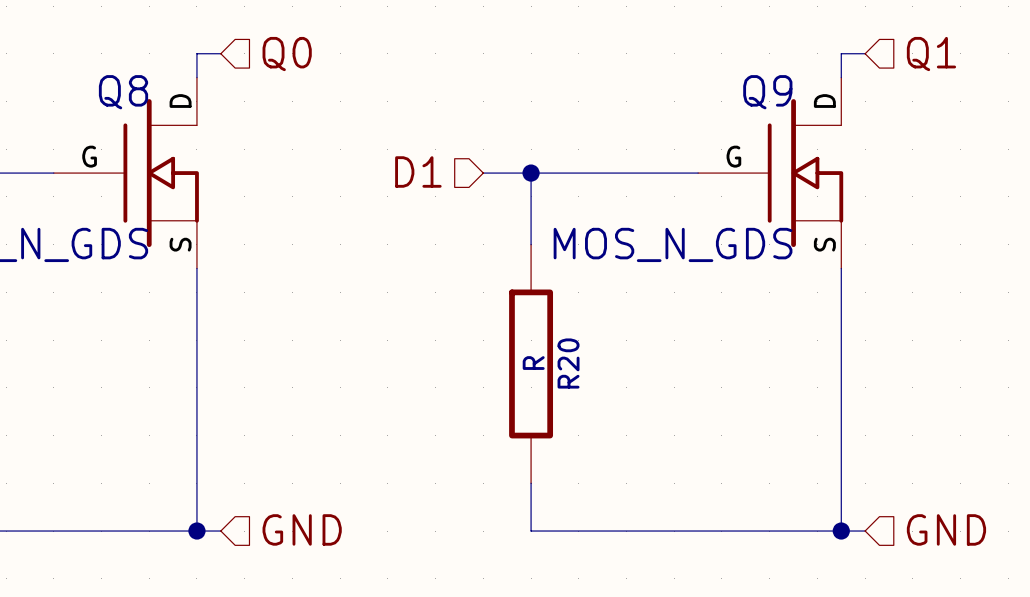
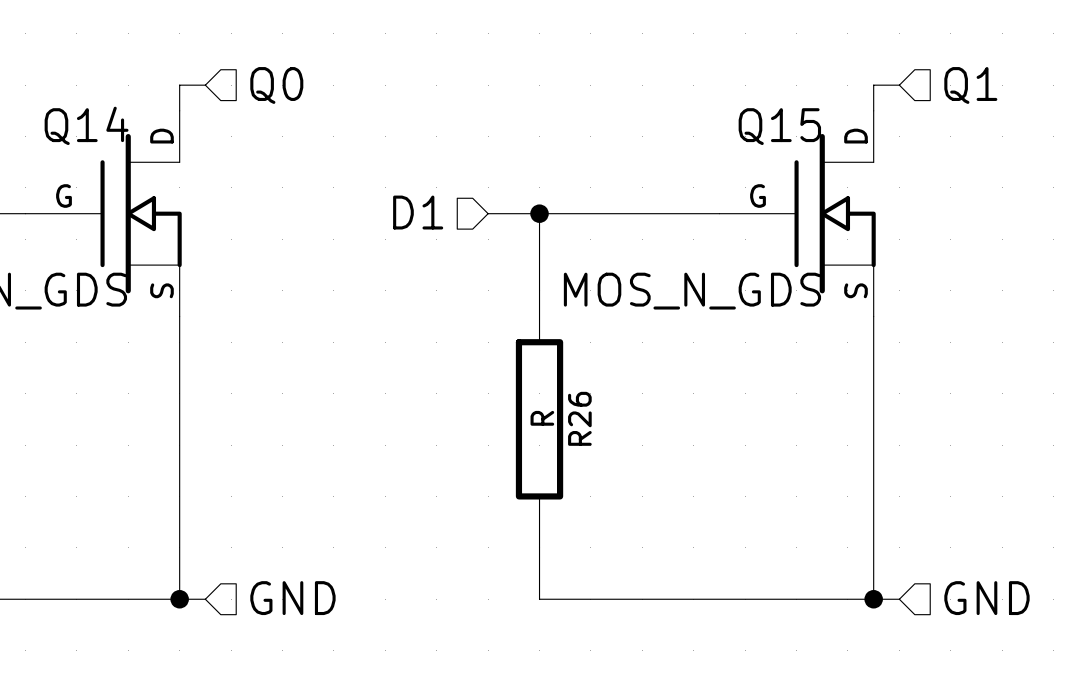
Q8 name: Q8 (123, 92) -> Q14 (86, 125)
Q9 name: Q9 (767, 92) -> Q15 (779, 126)
R20 name: R20 (568, 363) -> R26 (579, 418)

